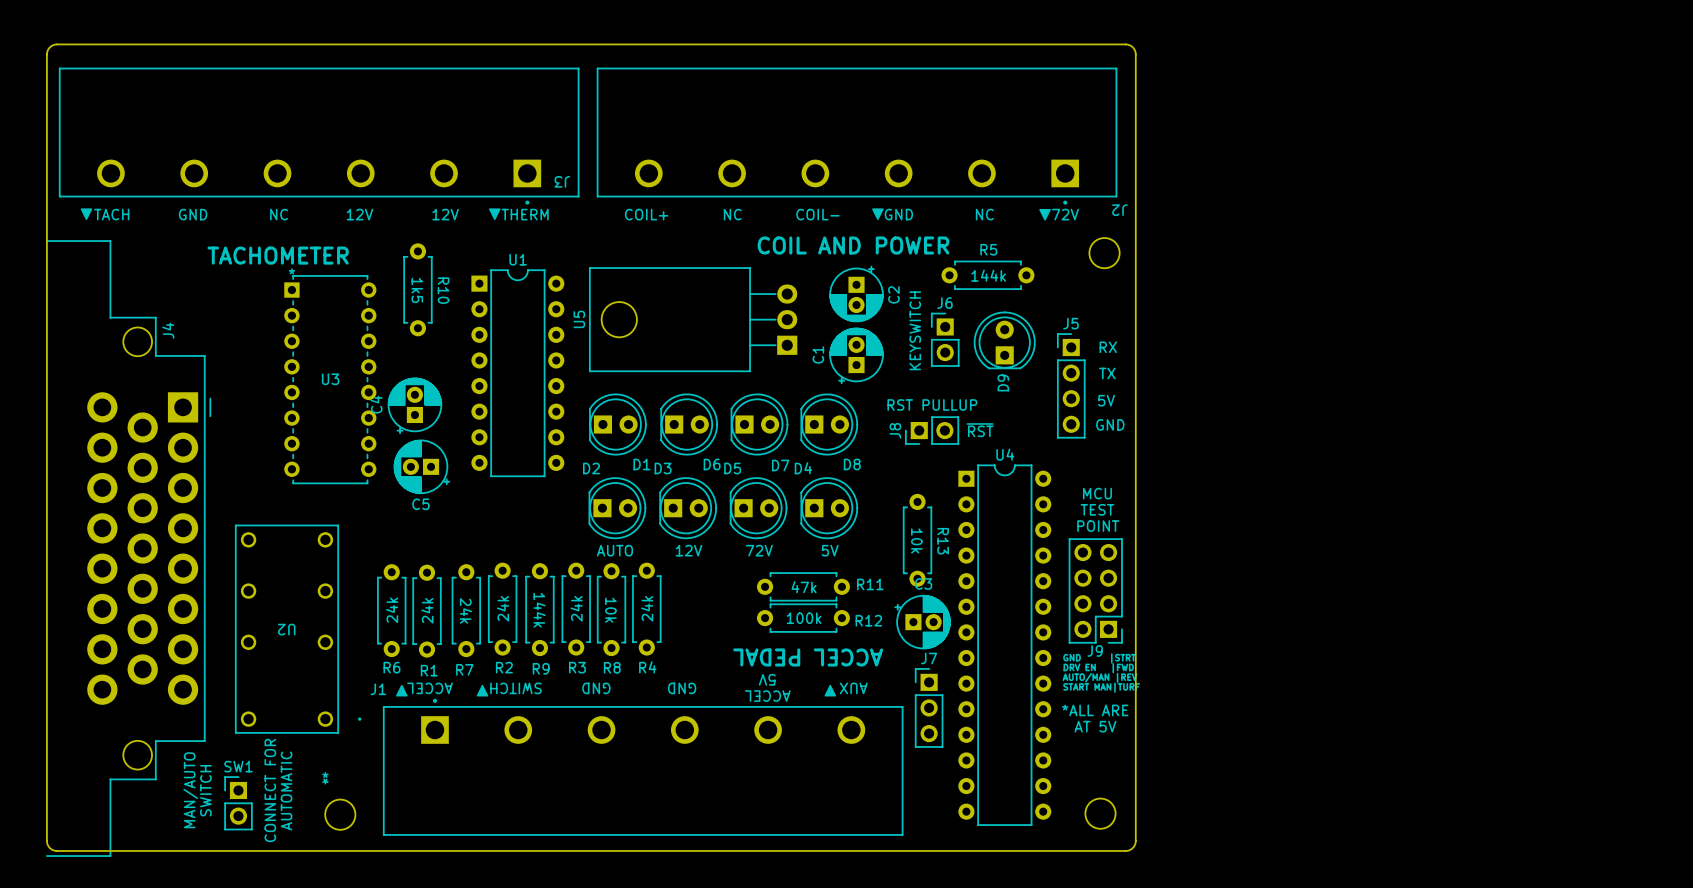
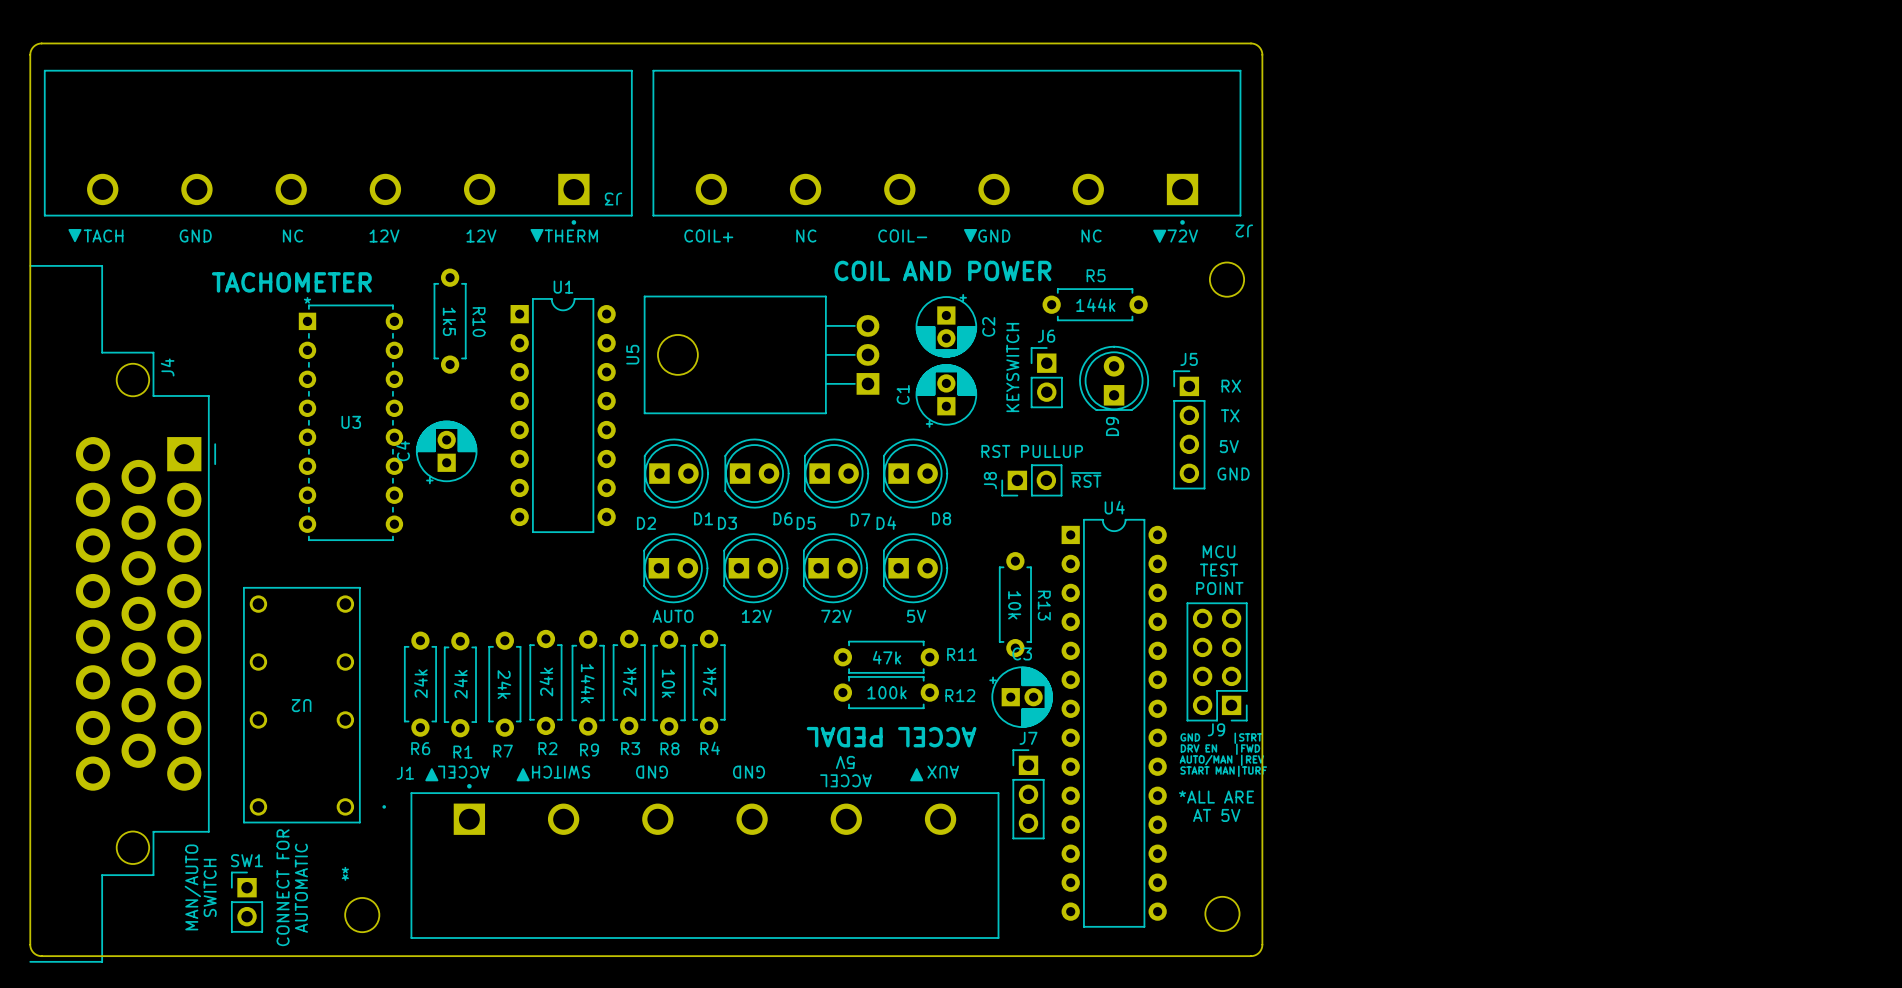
C5: (421, 466) -> none

